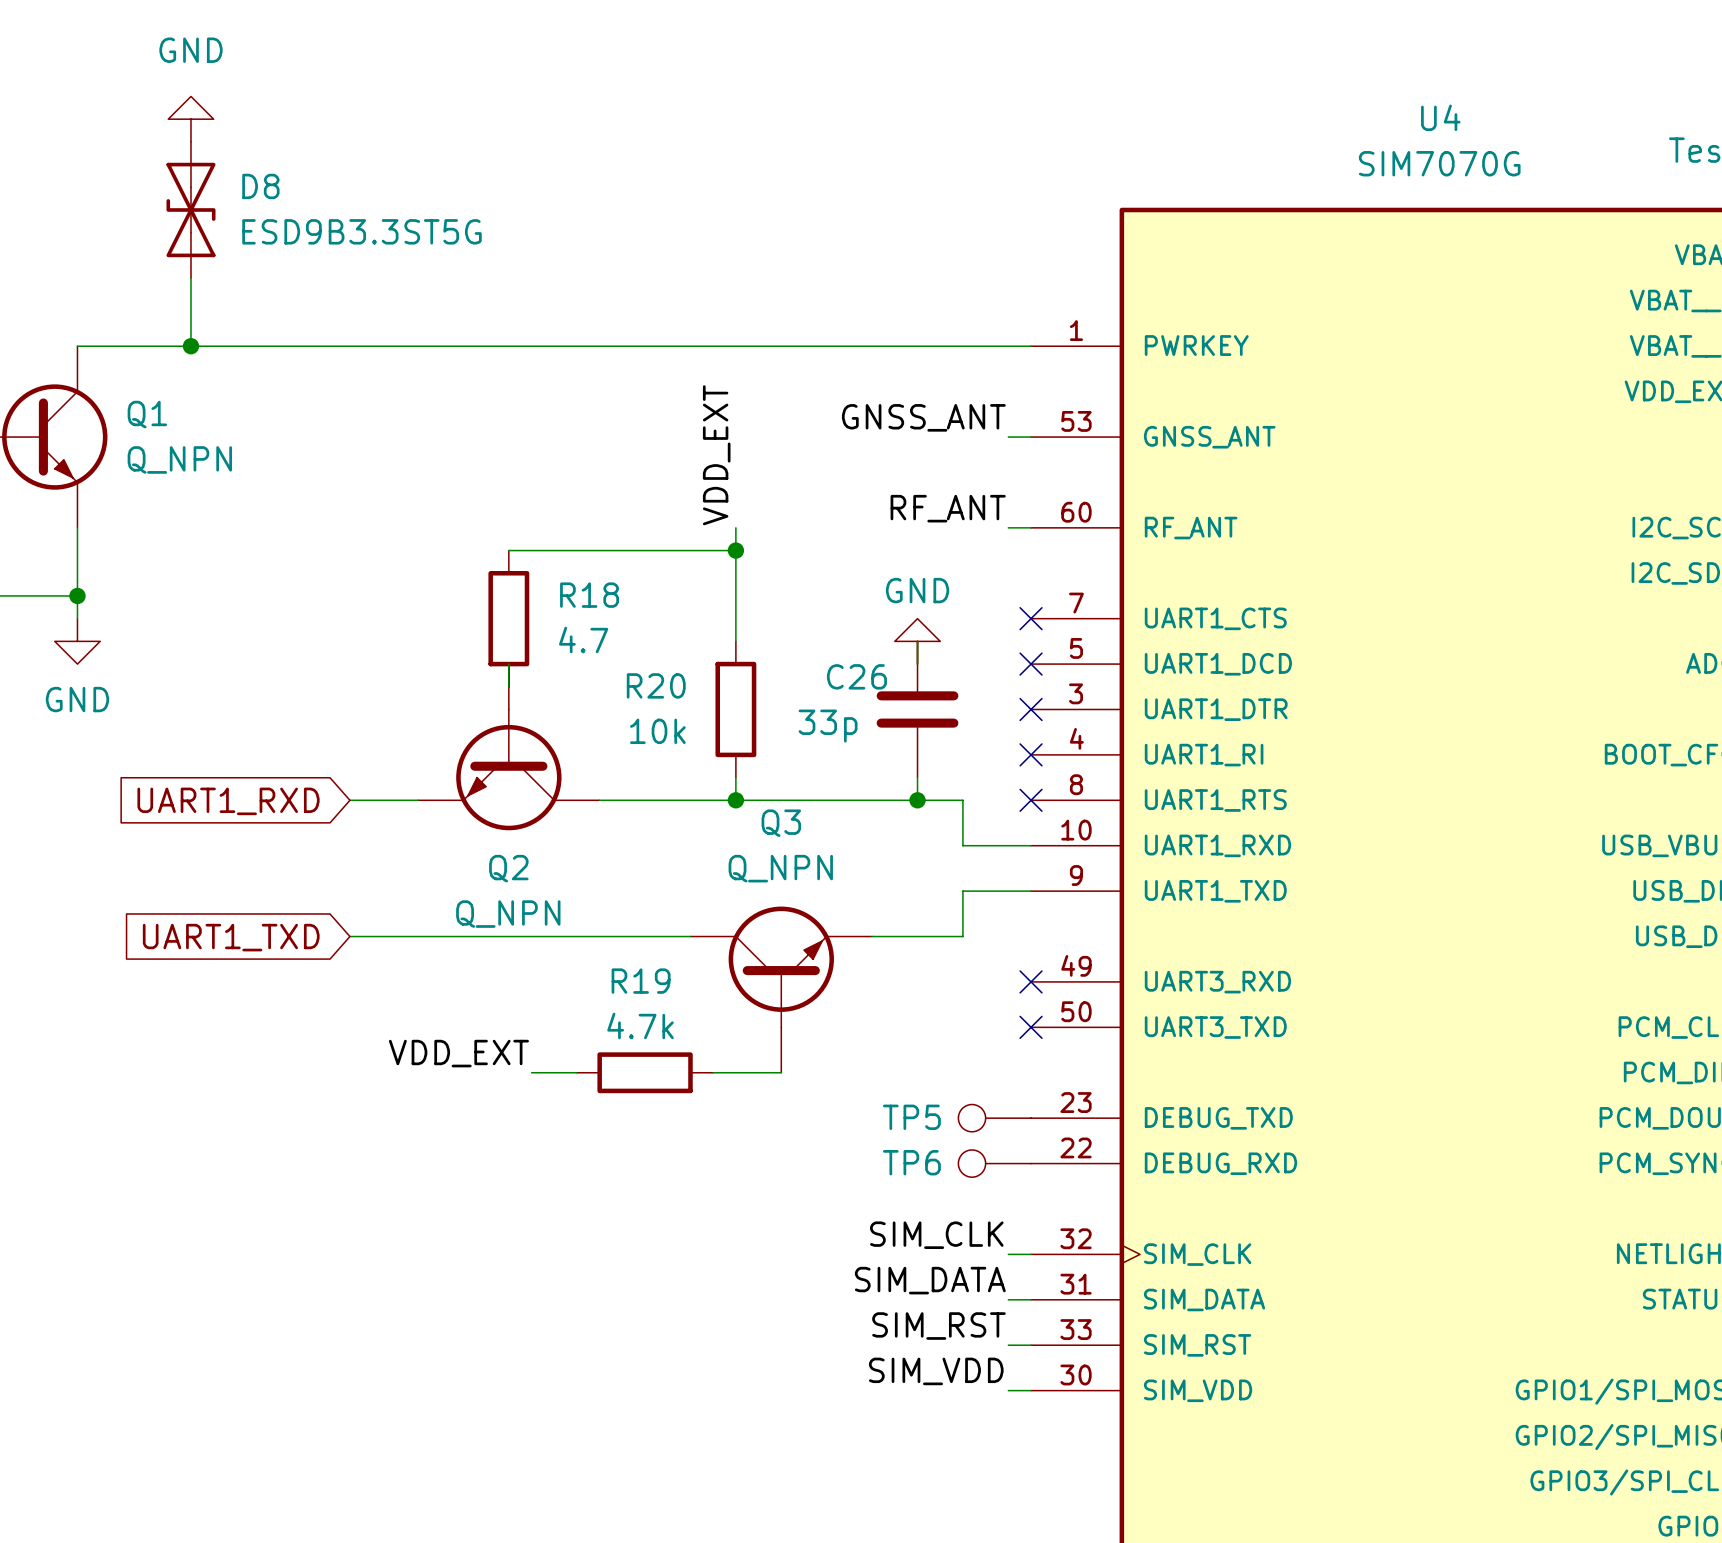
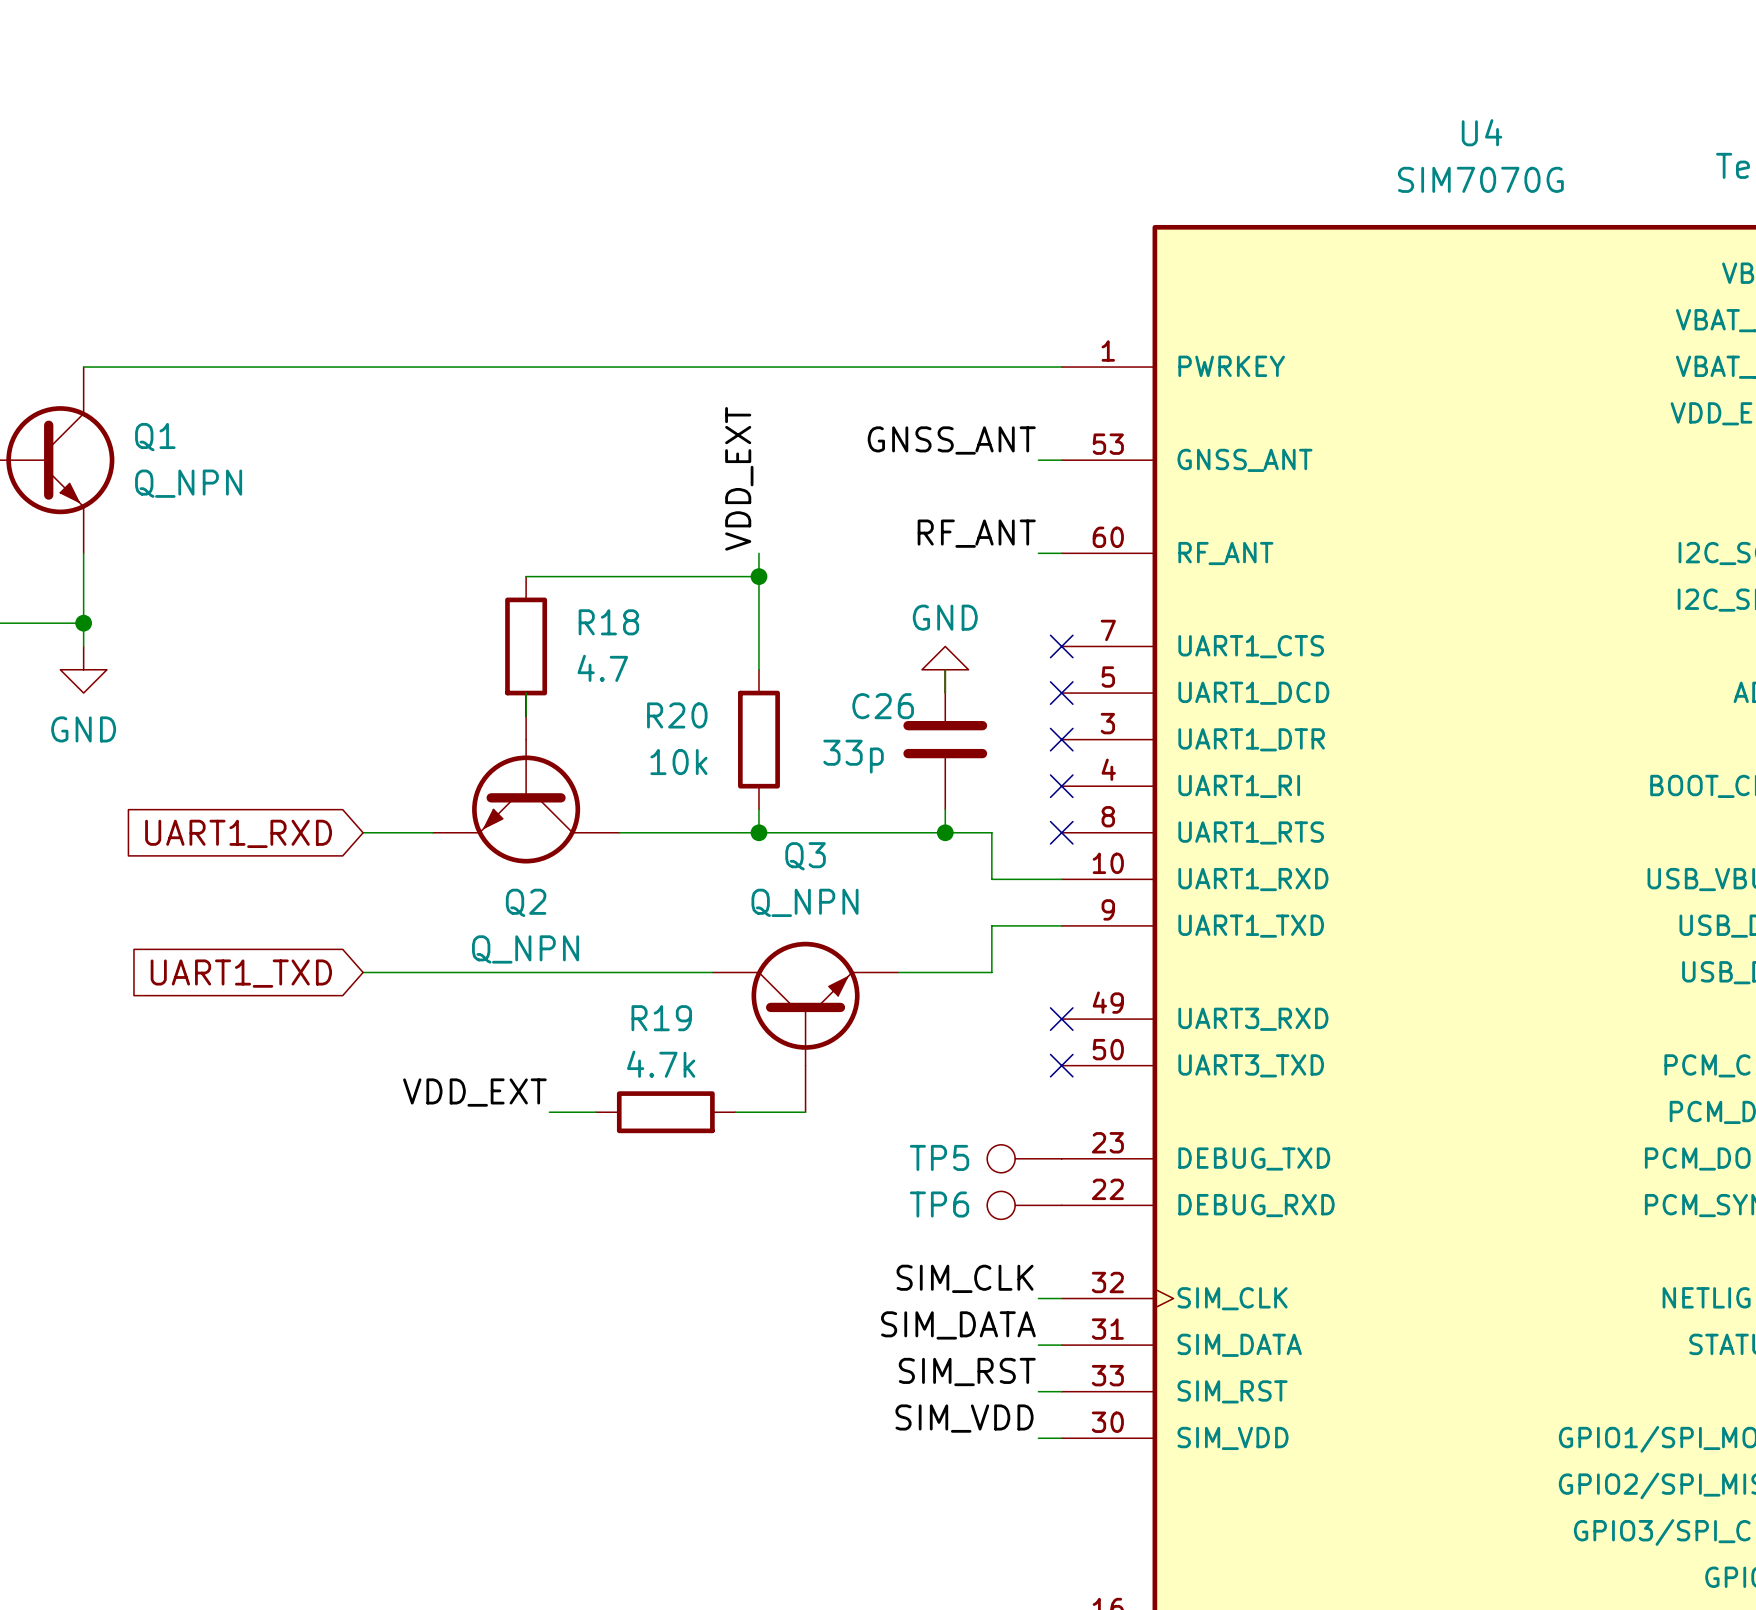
power symbol: GND (190, 119) -> none
D8: ESD9B3.3ST5G (190, 209) -> none
wire: (190, 278) (190, 346) -> none
junction: (190, 346) -> none

